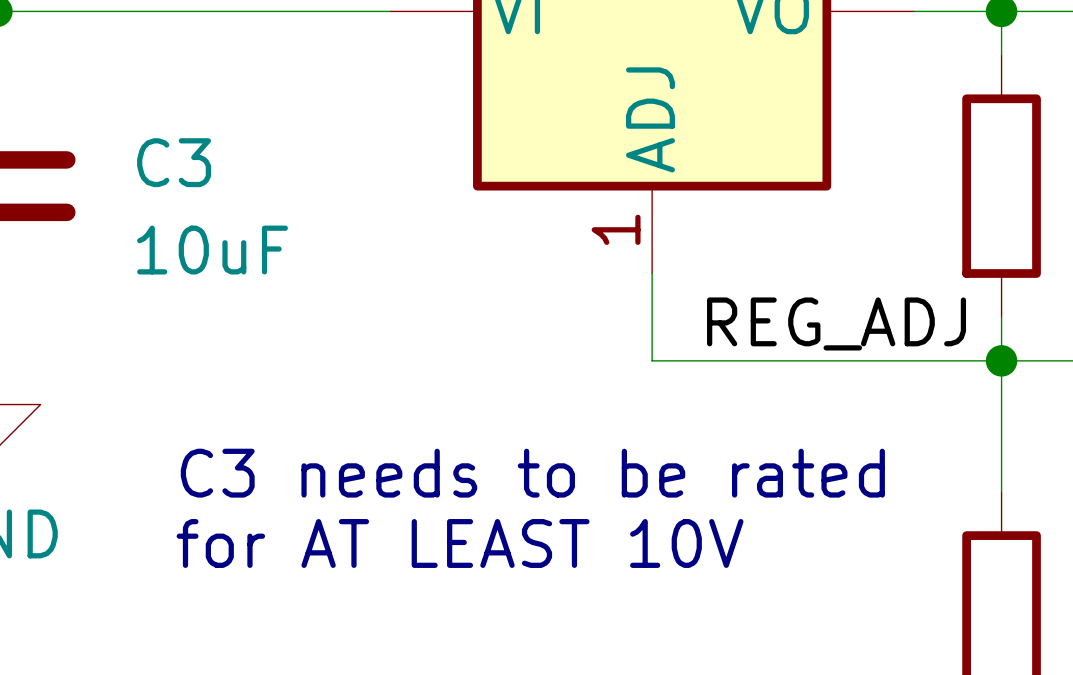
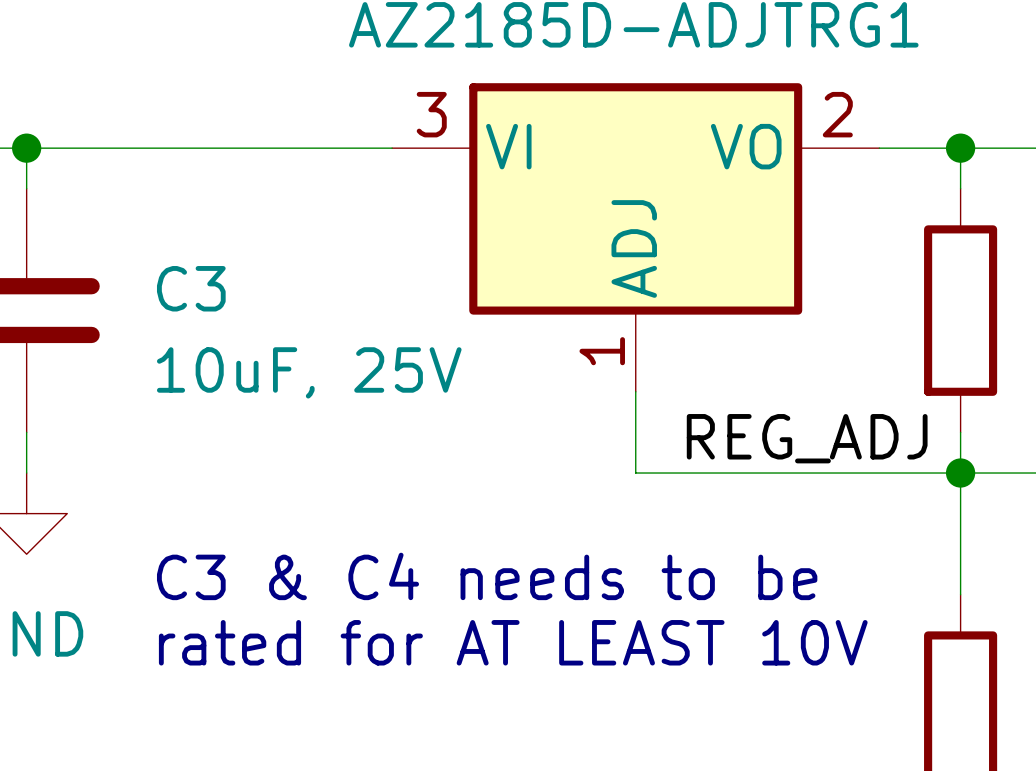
C3 value: 10uF (212, 250) -> 10uF, 25V (309, 372)
text: C3 needs to be rated (532, 473) -> C3 & C4 needs to be (487, 576)
text: for AT LEAST 10V (460, 543) -> rated for AT LEAST 10V (513, 642)

